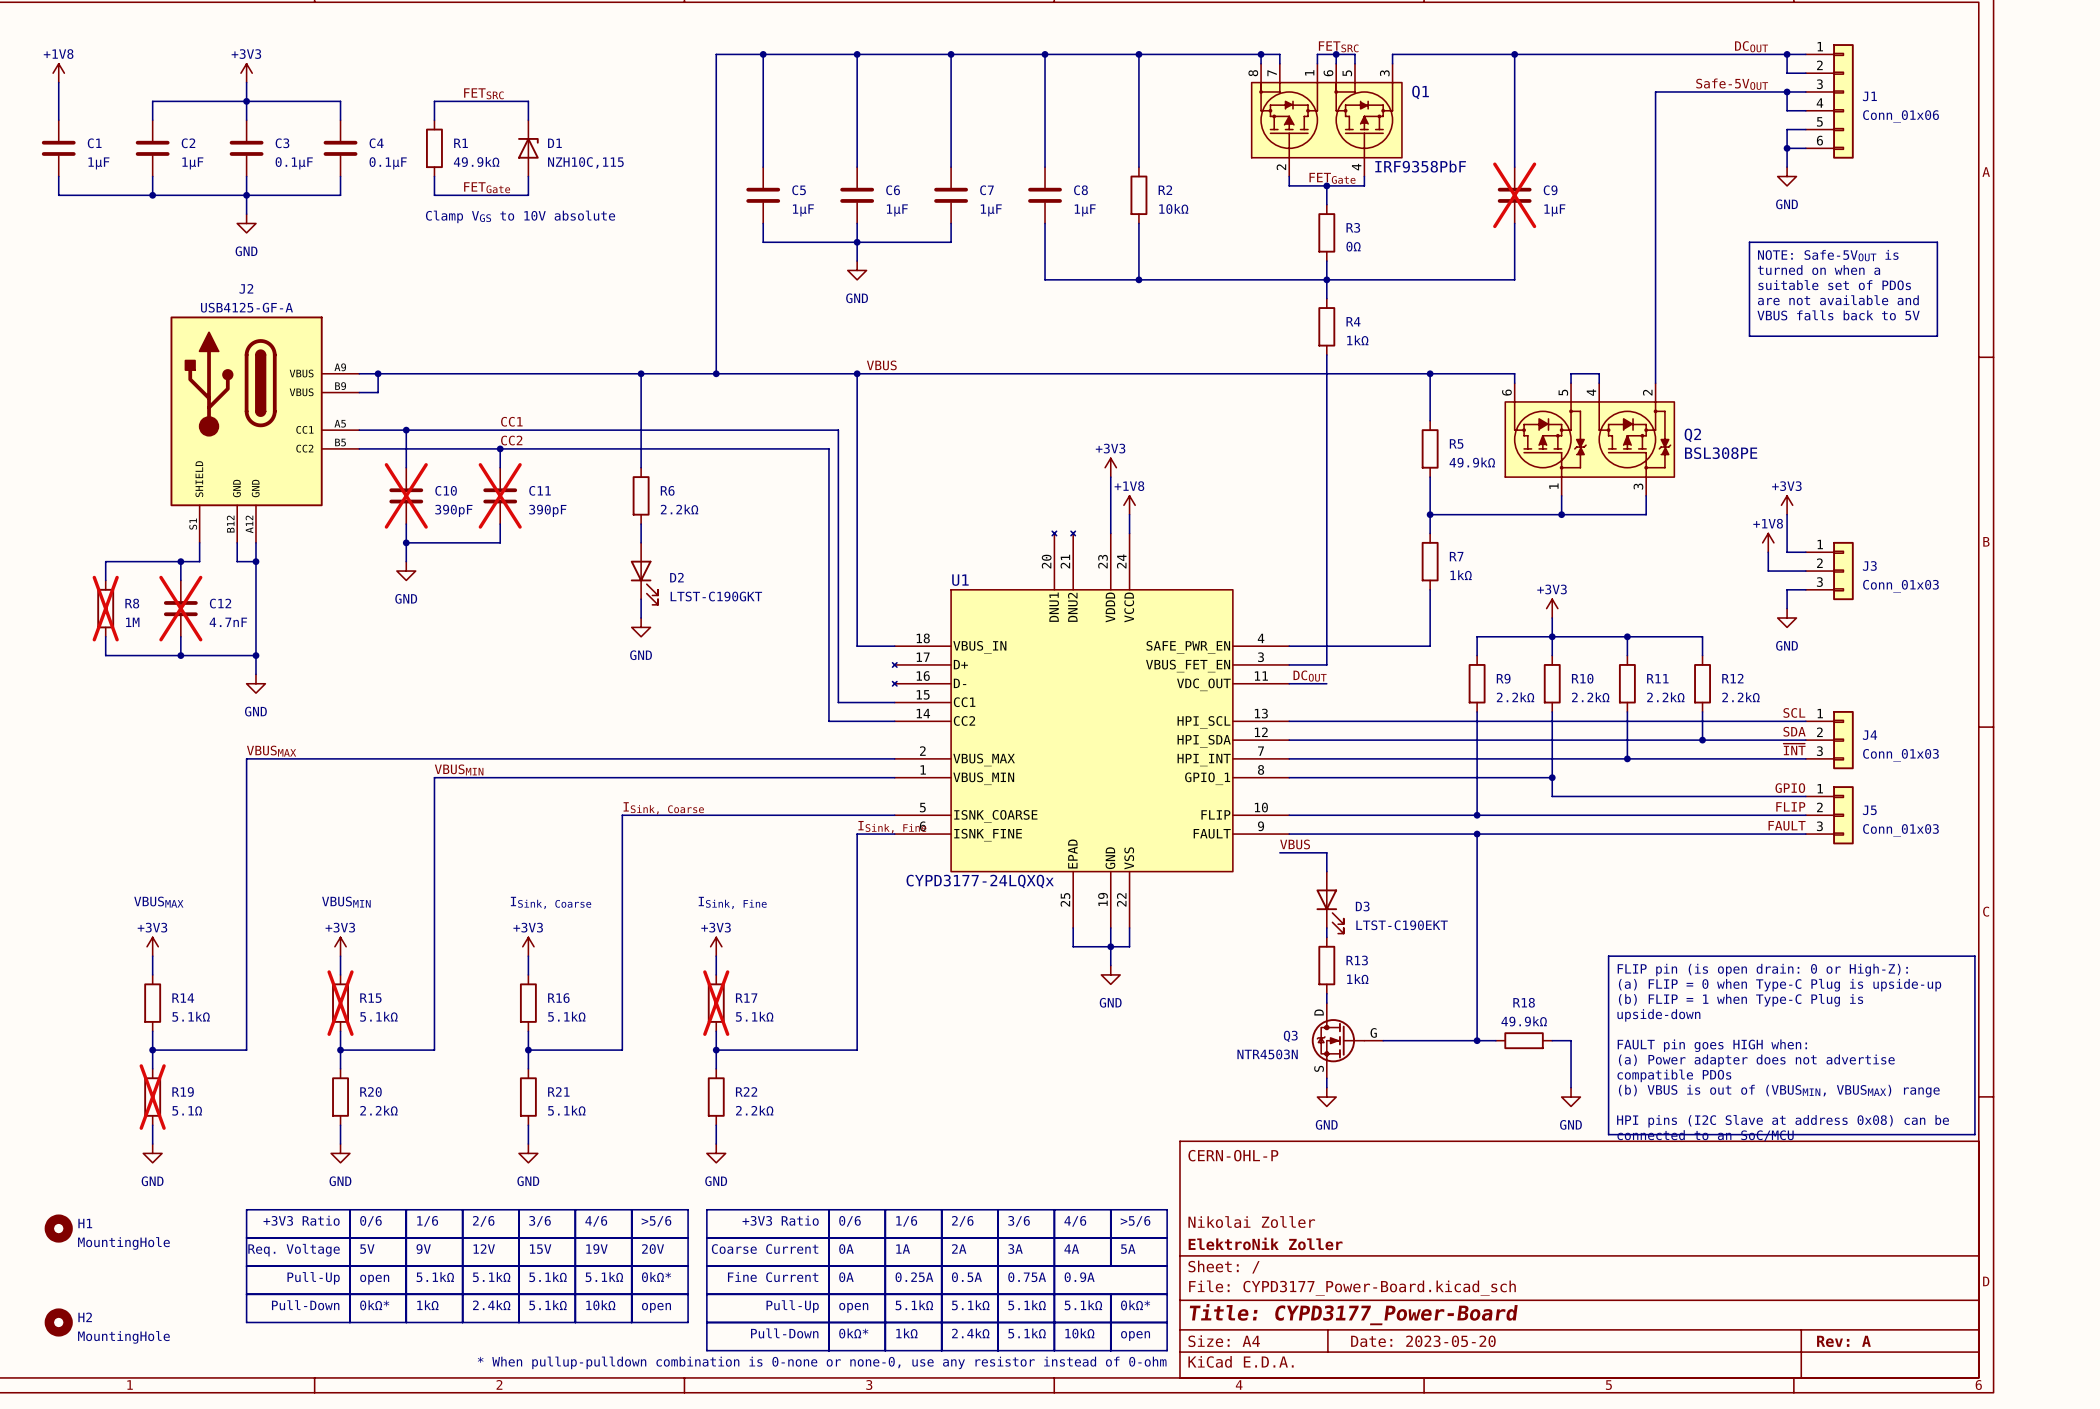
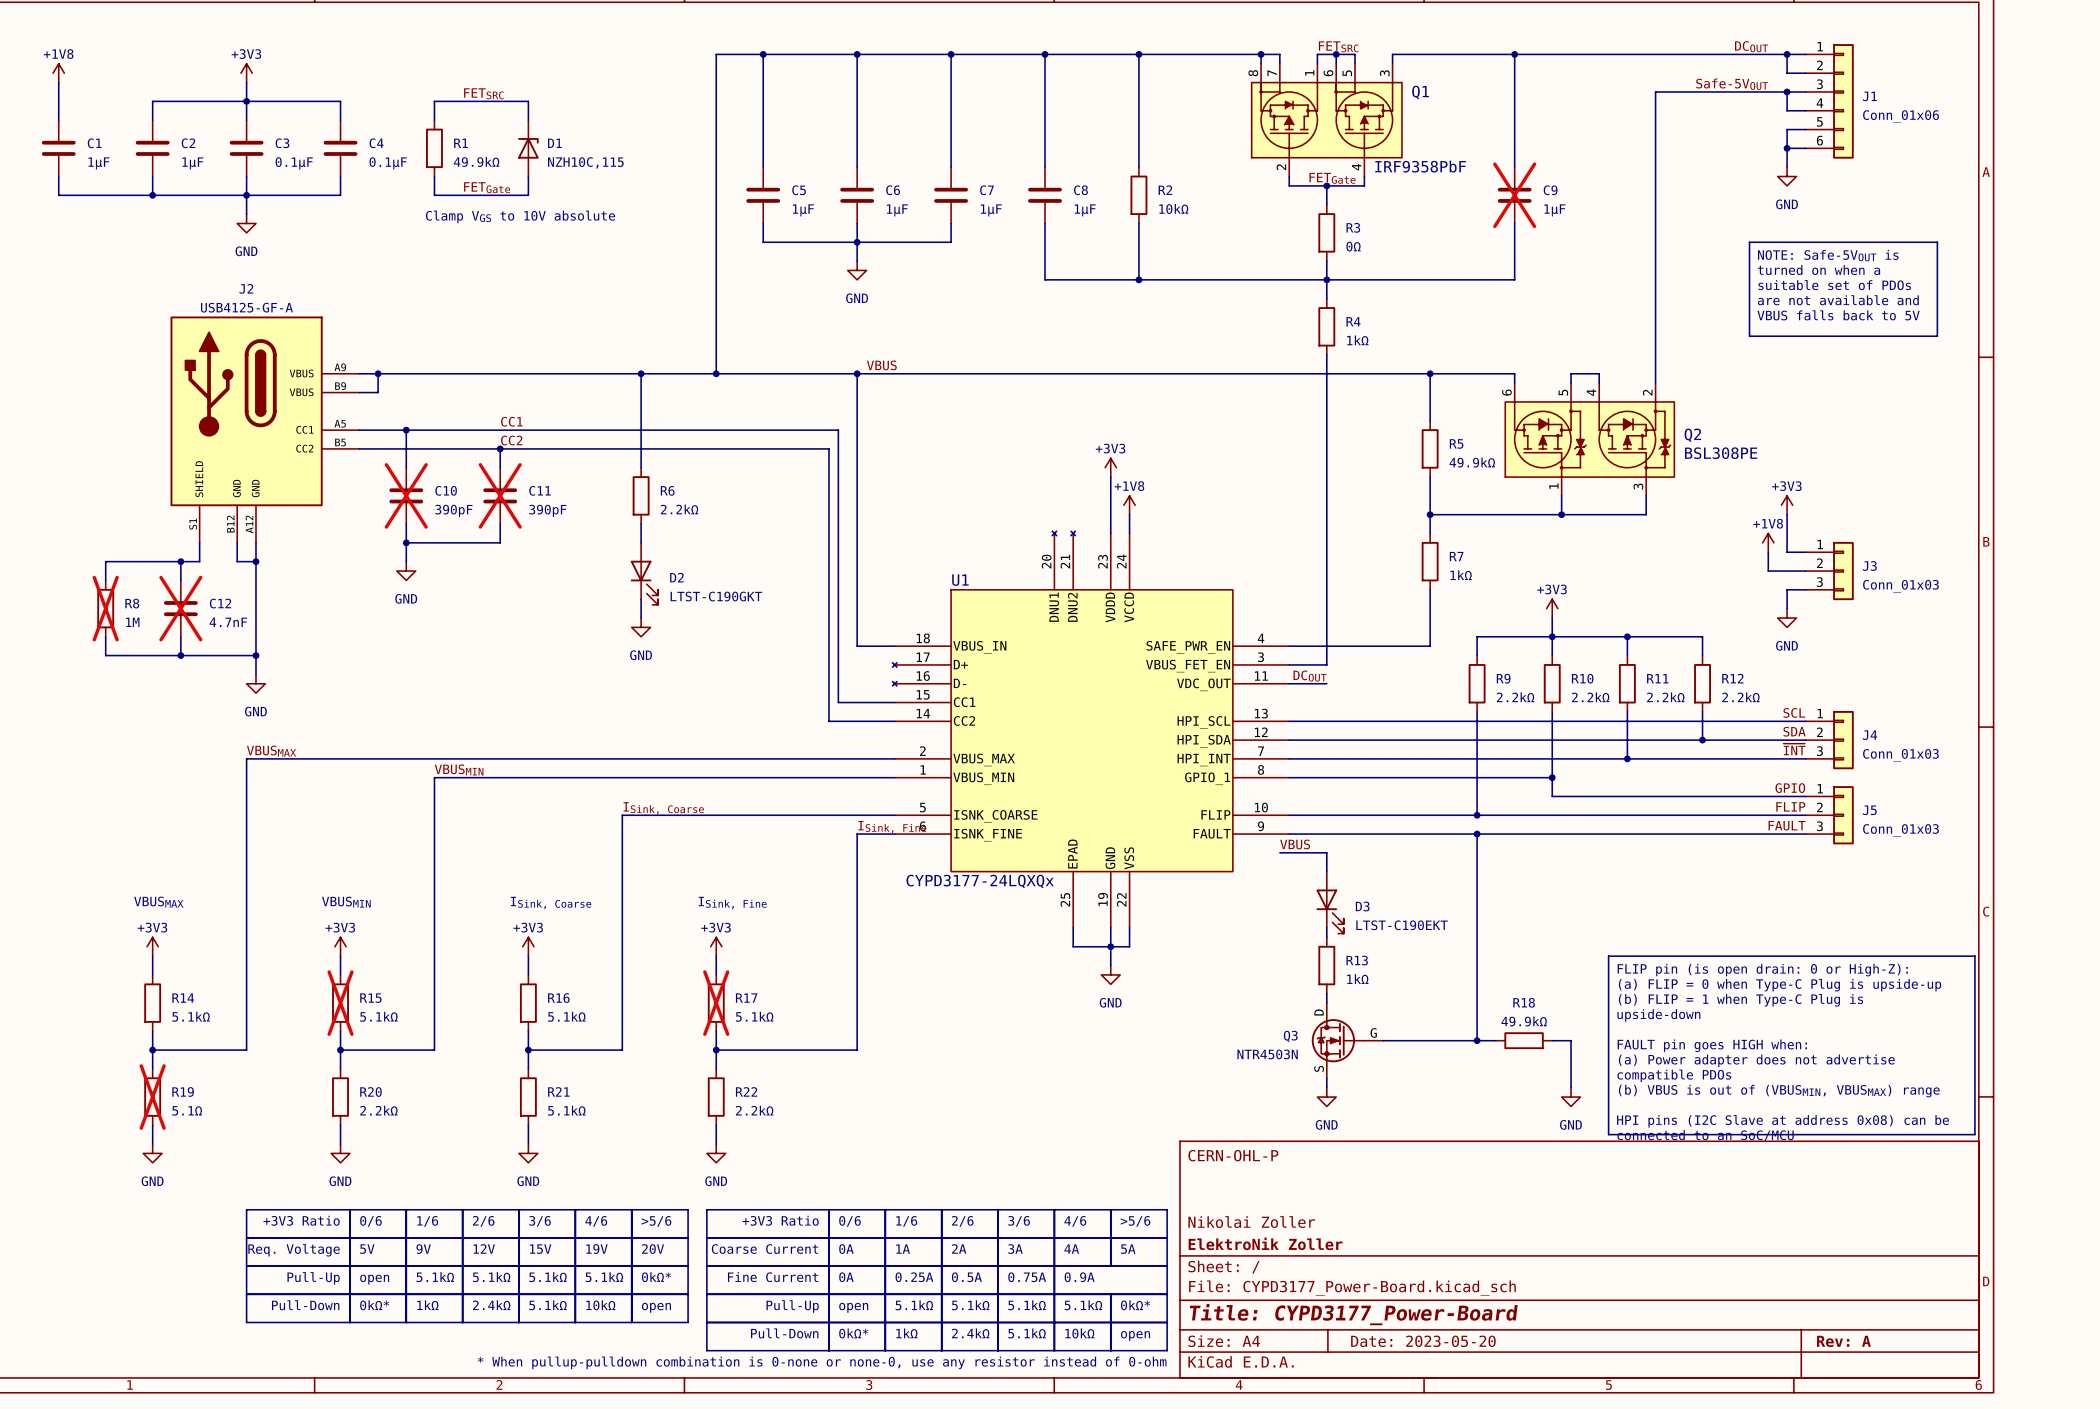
H1: MountingHole (58, 1228) -> none
H2: MountingHole (58, 1322) -> none

